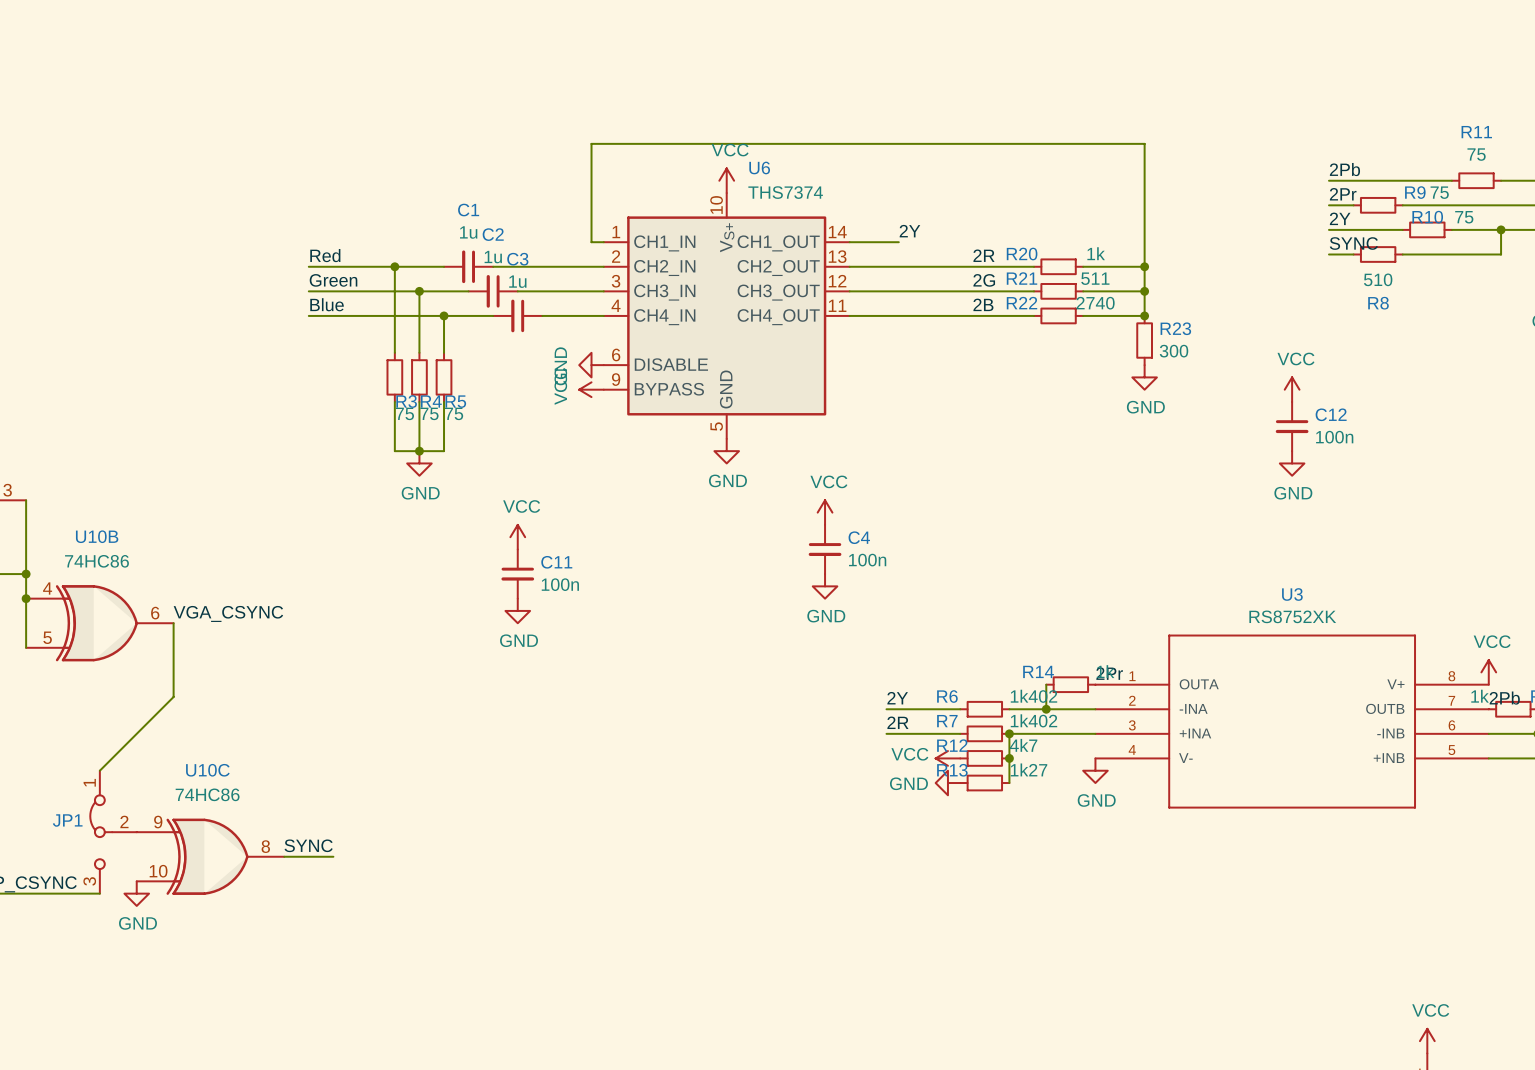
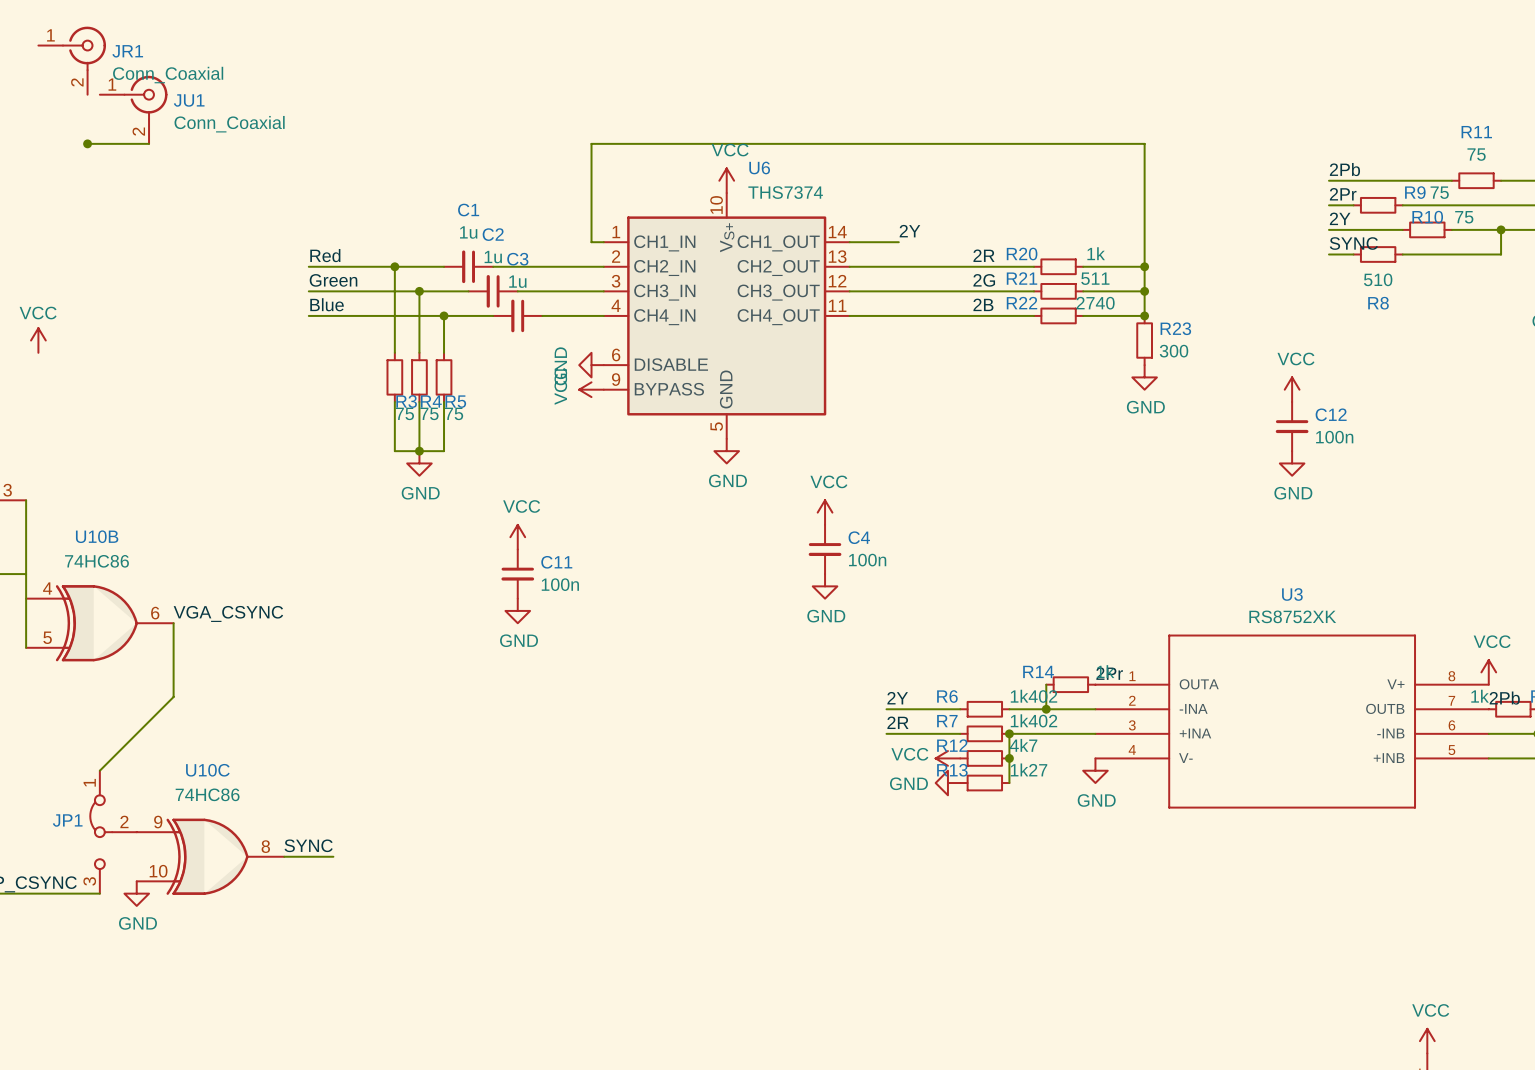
JR1: none -> Conn_Coaxial (72, 60)
JU1: none -> Conn_Coaxial (133, 109)
wire: none -> (87, 143) (149, 143)
junction: none -> (87, 143)
power symbol: none -> VCC (38, 340)
junction: (26, 574) -> none
junction: (26, 598) -> none

